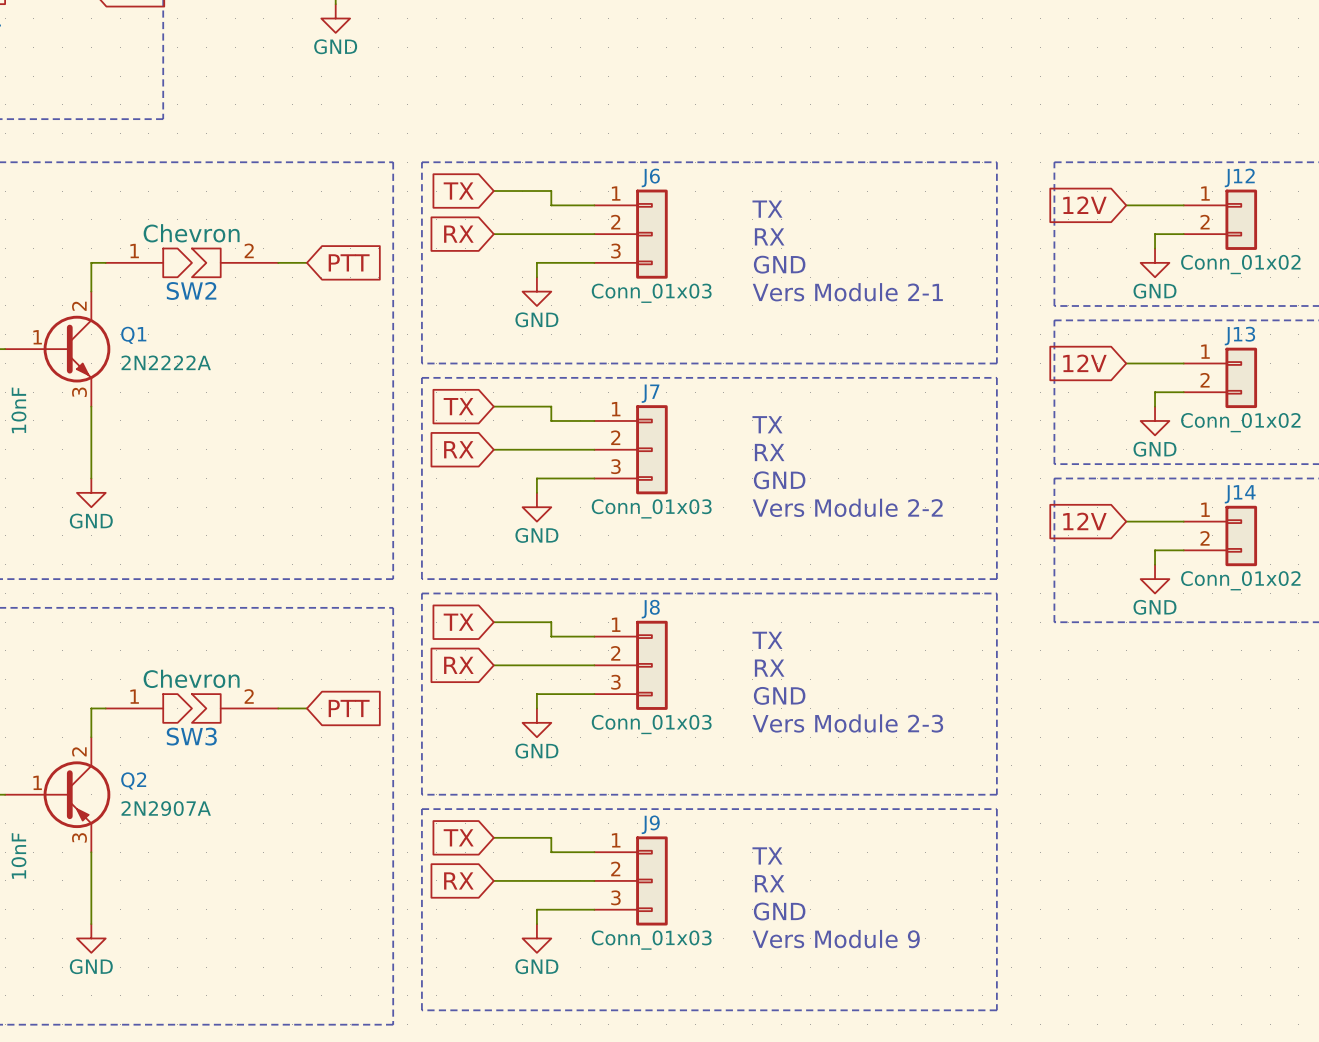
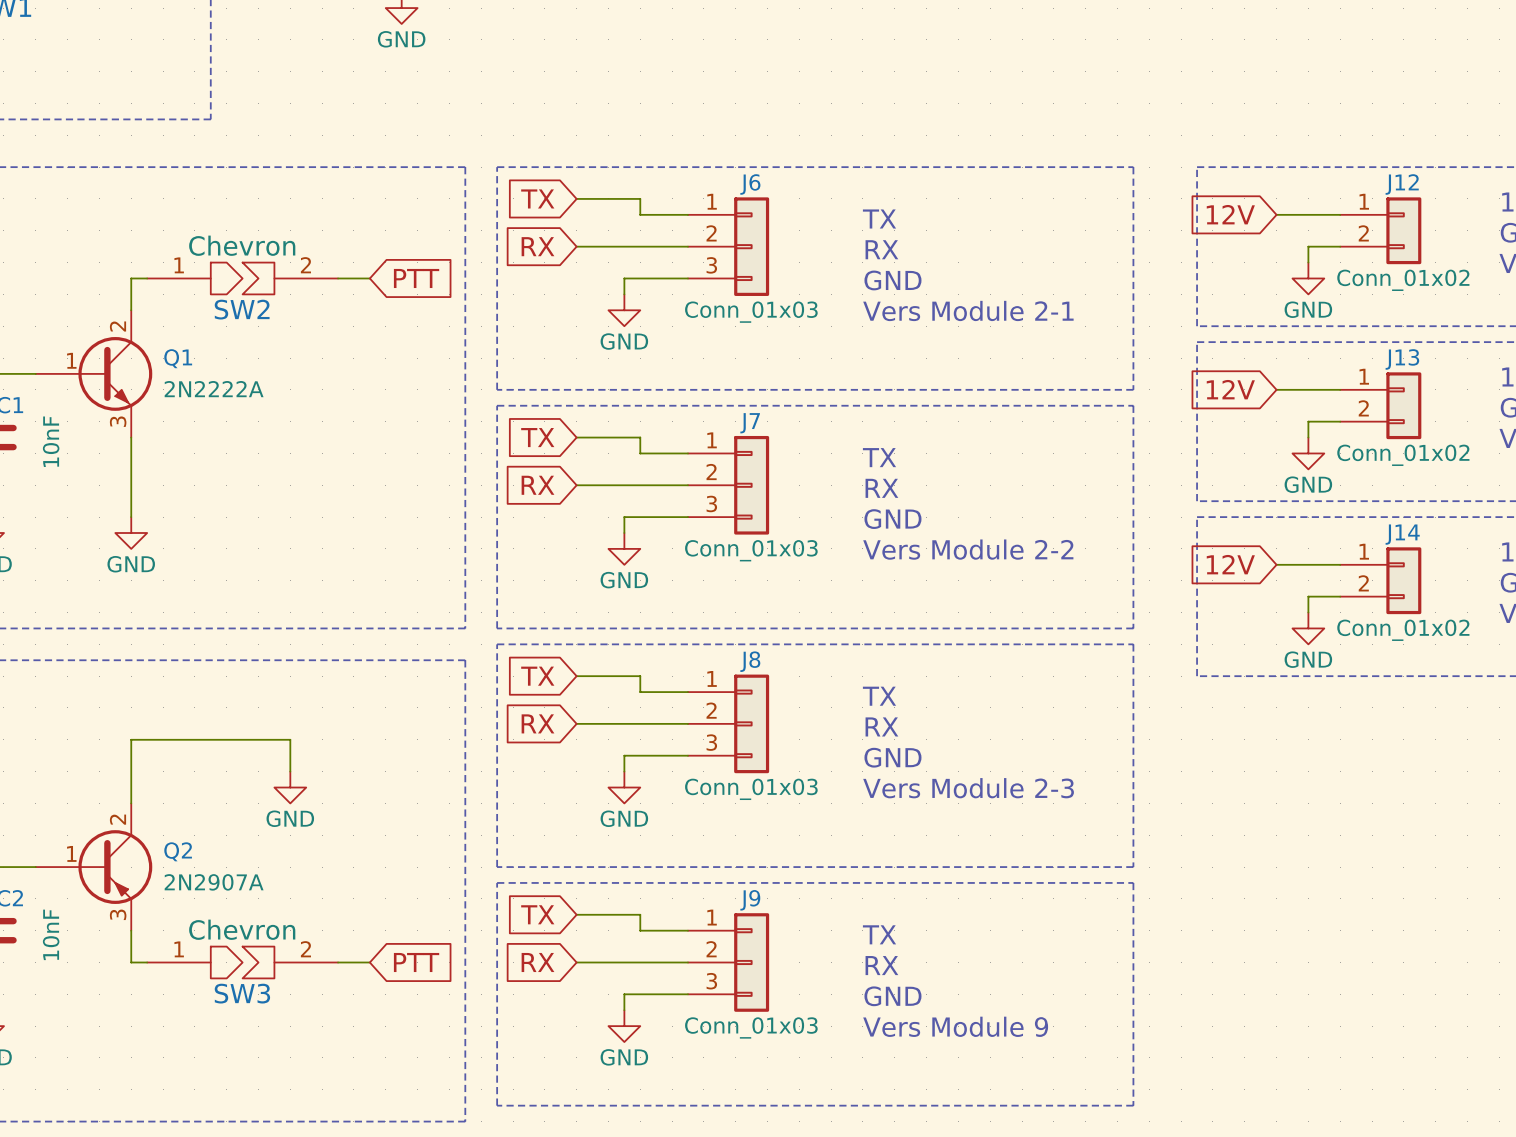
wire: (91, 708) (105, 708) -> (131, 771) (131, 739) (290, 739) (290, 771)
SW3 position: (191, 708) -> (242, 962)
wire: (278, 708) (306, 708) -> (338, 962) (369, 962)
global label position: PTT (349, 708) -> PTT (416, 962)
wire: (91, 880) (91, 924) -> (131, 962) (147, 962)
power symbol position: GND (91, 938) -> GND (290, 787)

